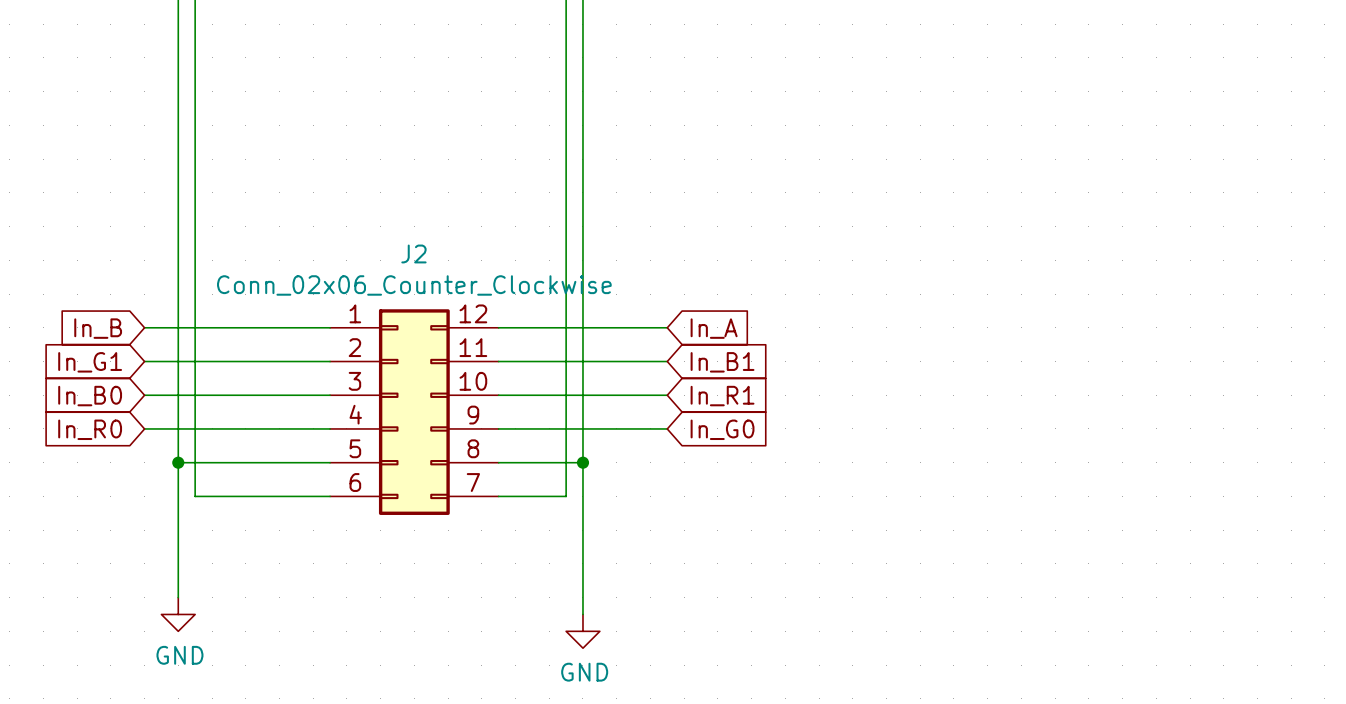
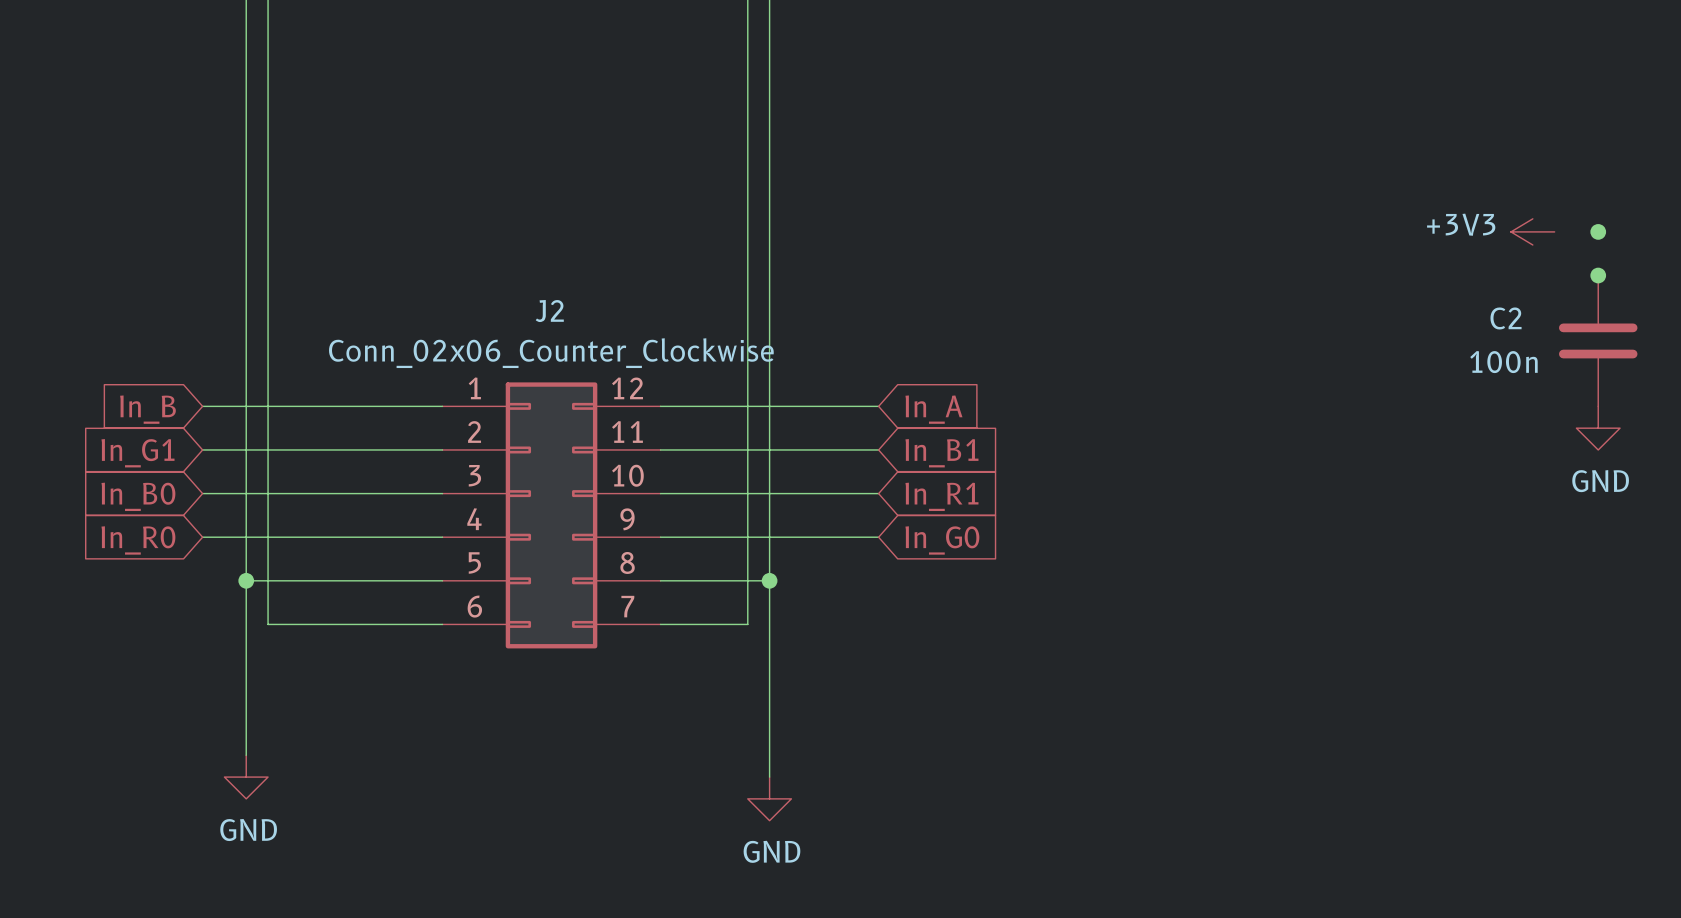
power symbol: none -> +3V3 (1532, 231)
junction: none -> (1598, 231)
junction: none -> (1598, 275)
C2: none -> 100n (1598, 340)
power symbol: none -> GND (1598, 428)

